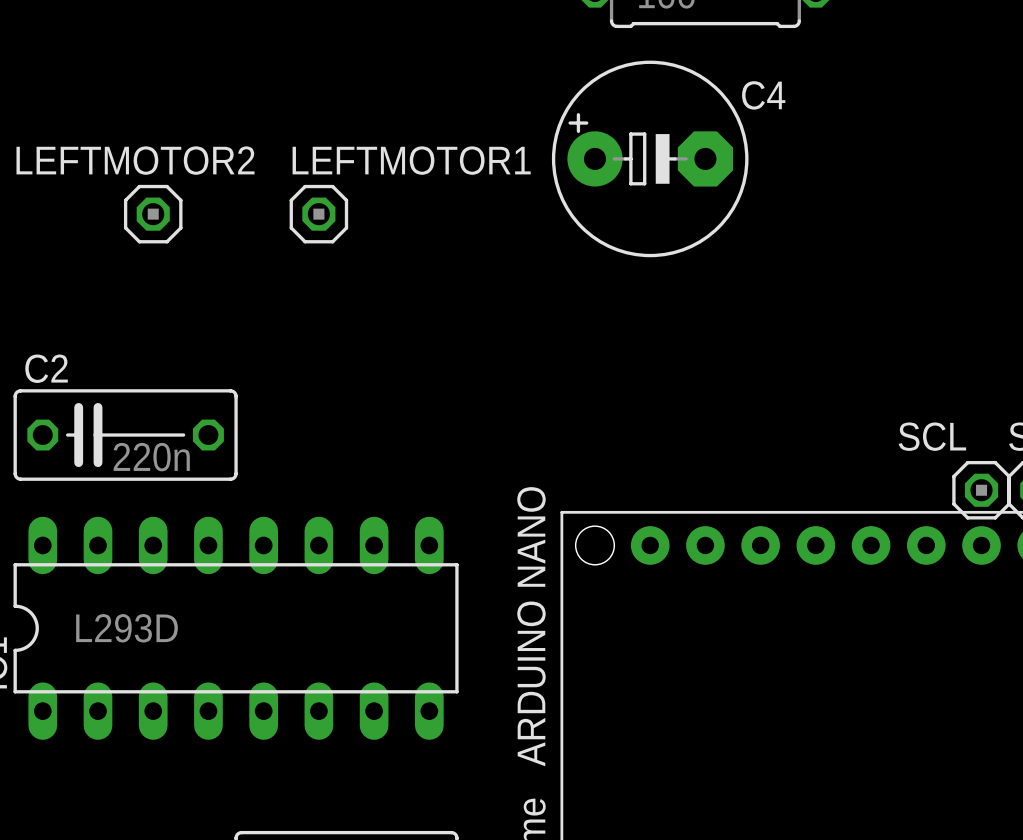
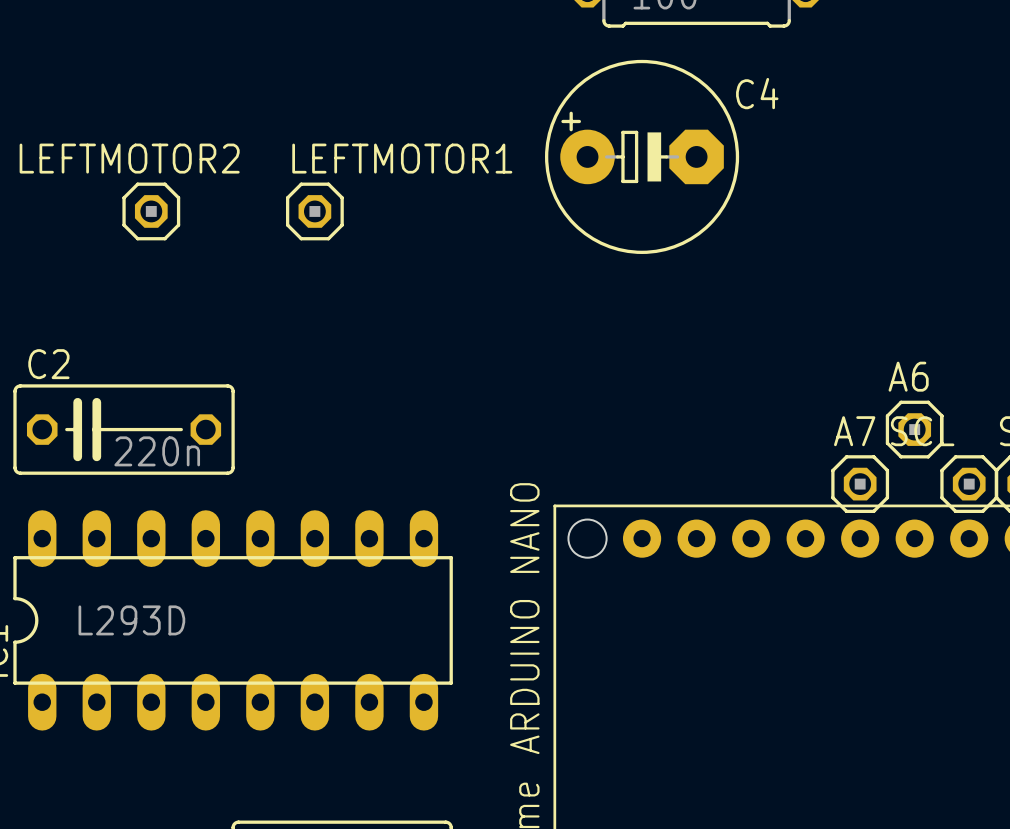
A6: none -> (914, 429)
A7: none -> (860, 484)

